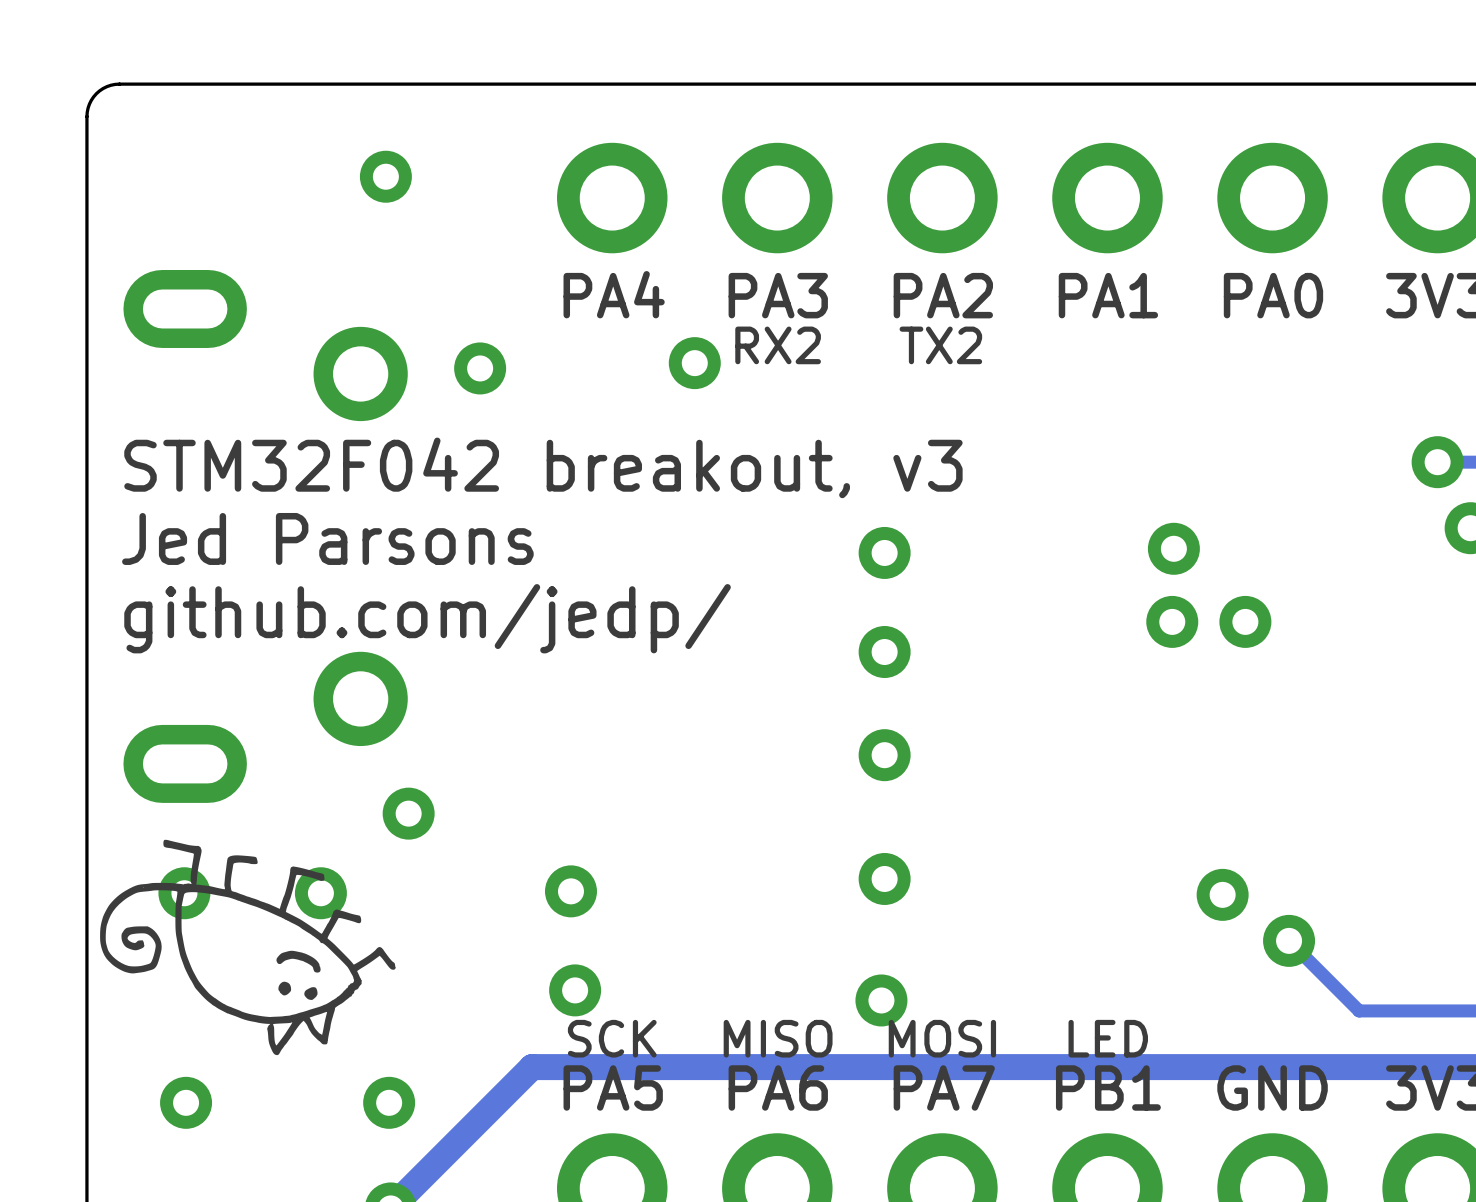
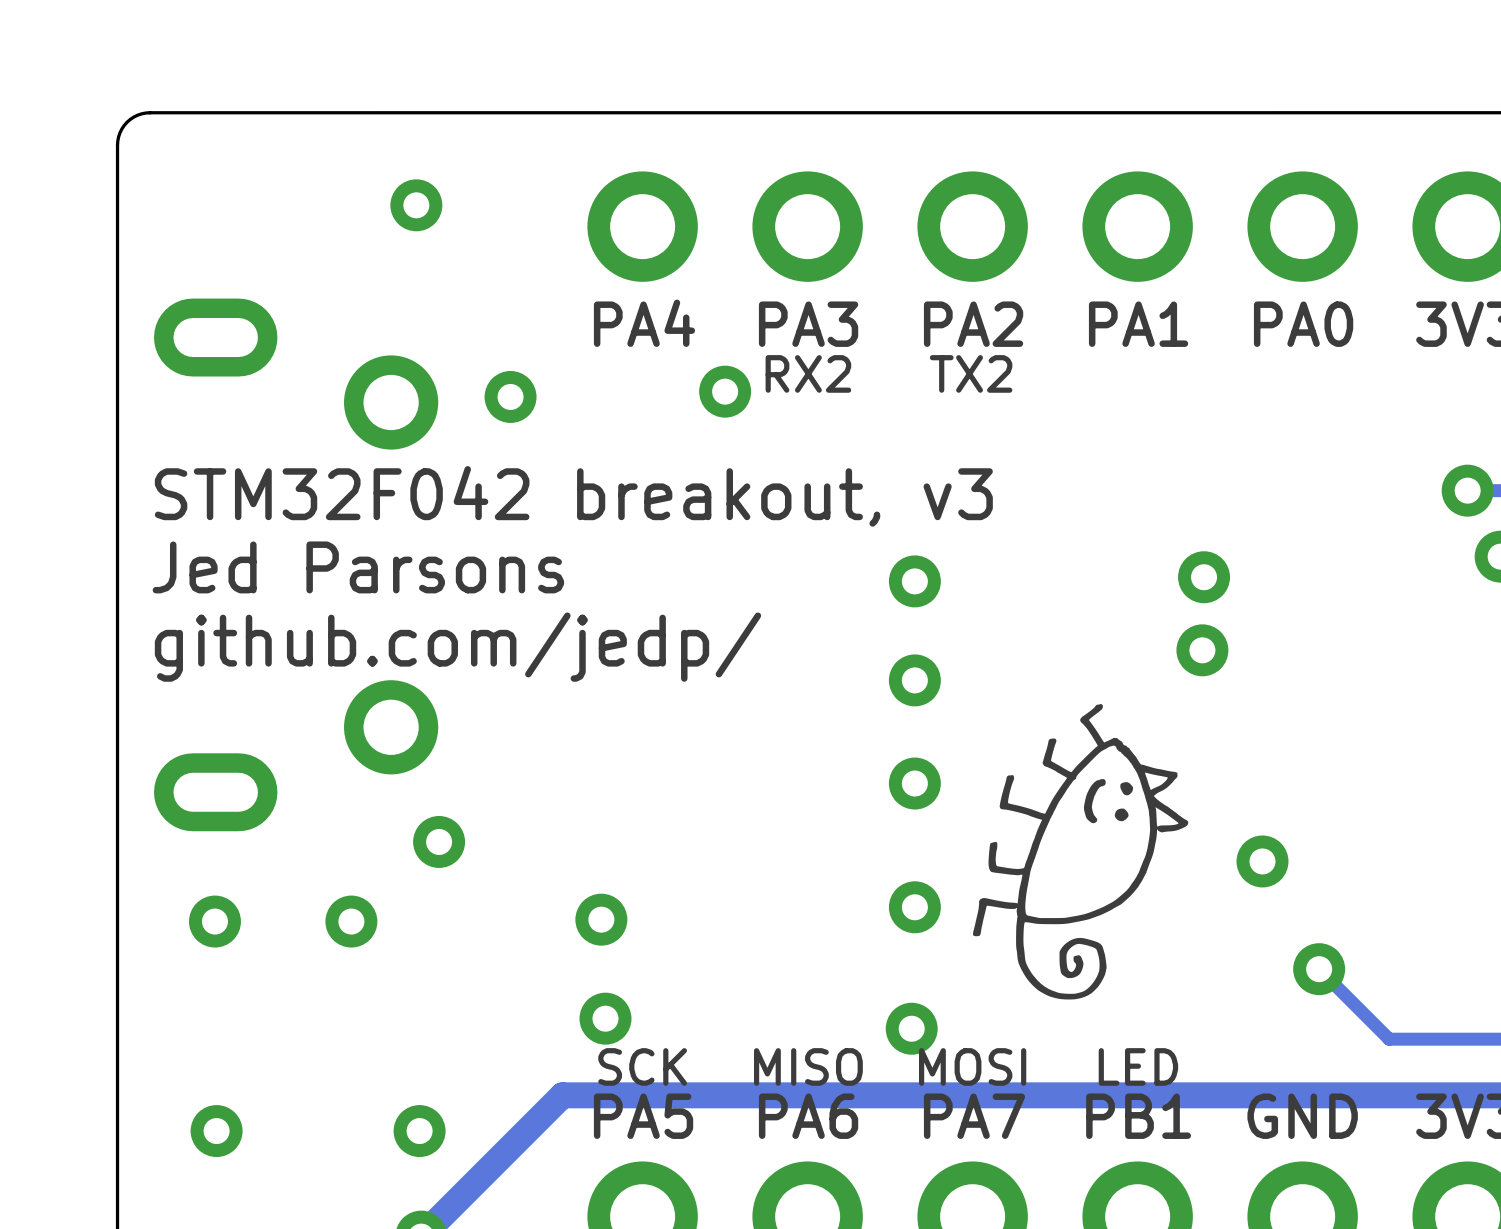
via: (1245, 621) -> none
drawing: none -> [973, 703, 1189, 1000]
drawing: [100, 839, 396, 1056] -> none
via position: (1222, 894) -> (1262, 861)

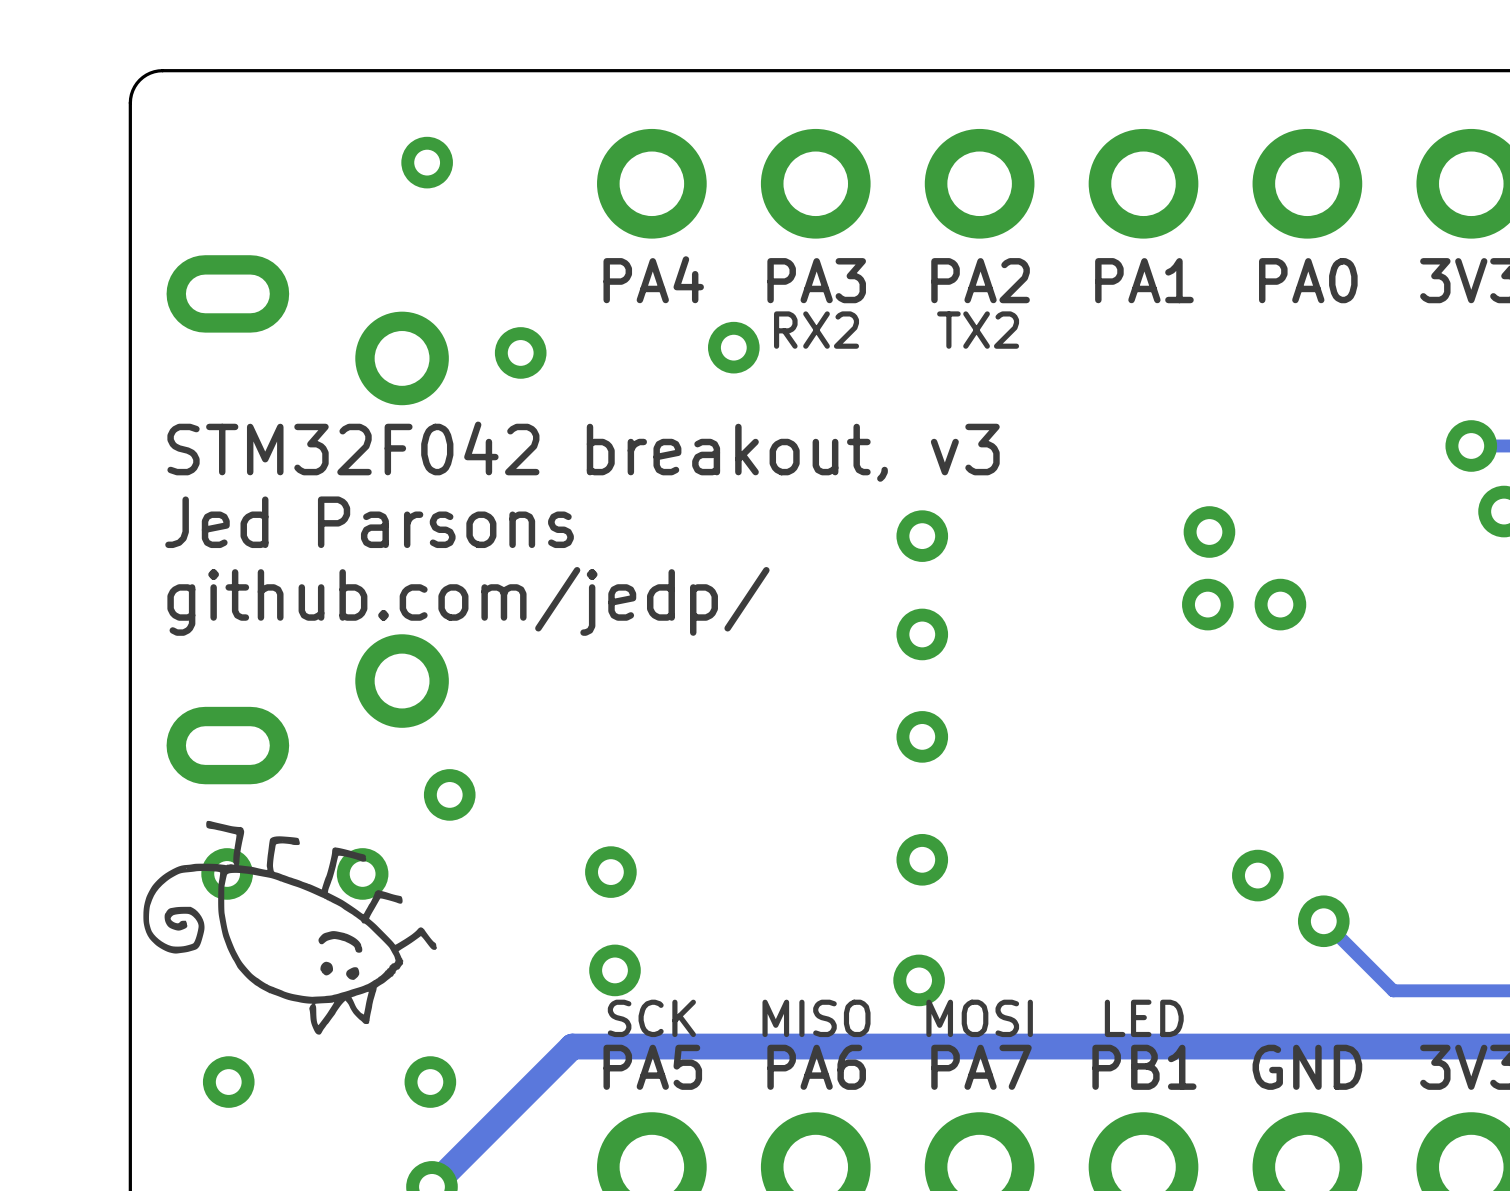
via: none -> (1280, 604)
drawing: [973, 703, 1189, 1000] -> none
via position: (1262, 861) -> (1257, 875)
drawing: none -> [143, 820, 437, 1035]

